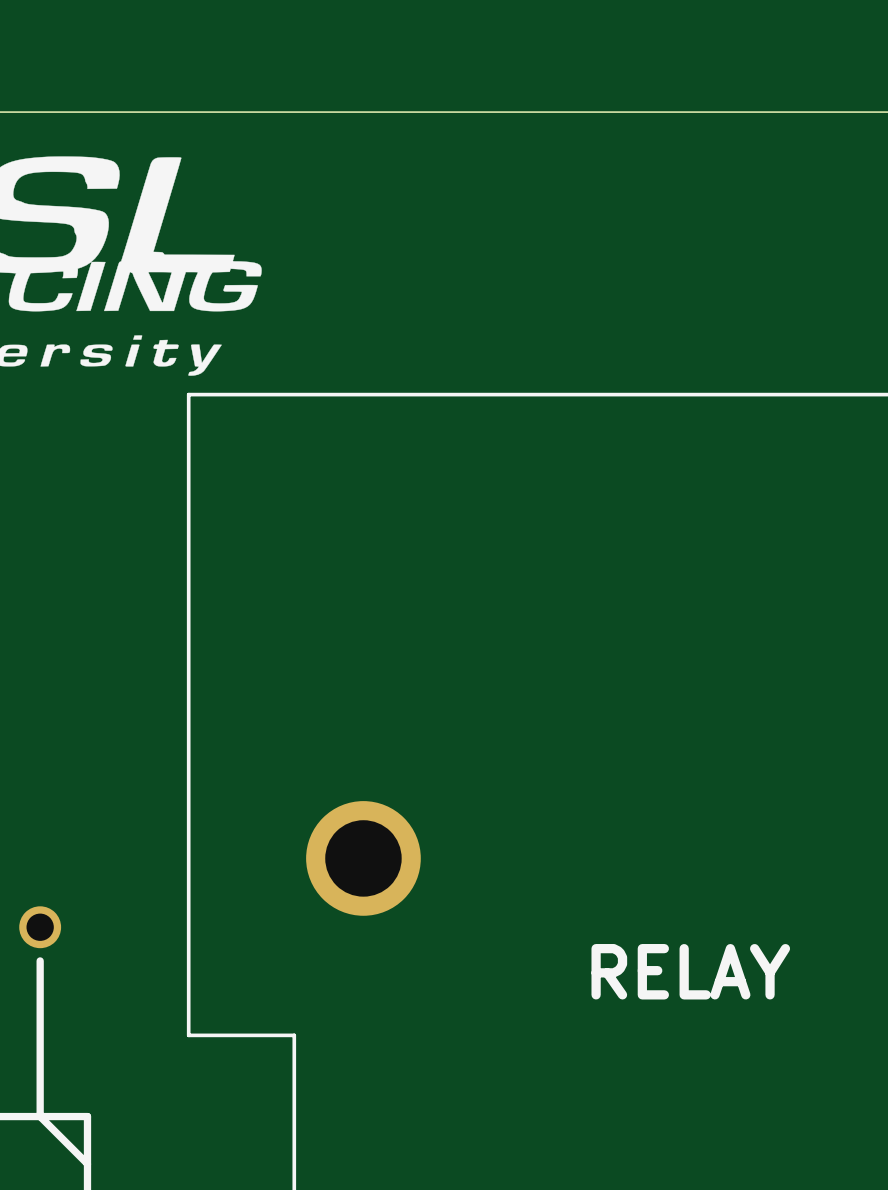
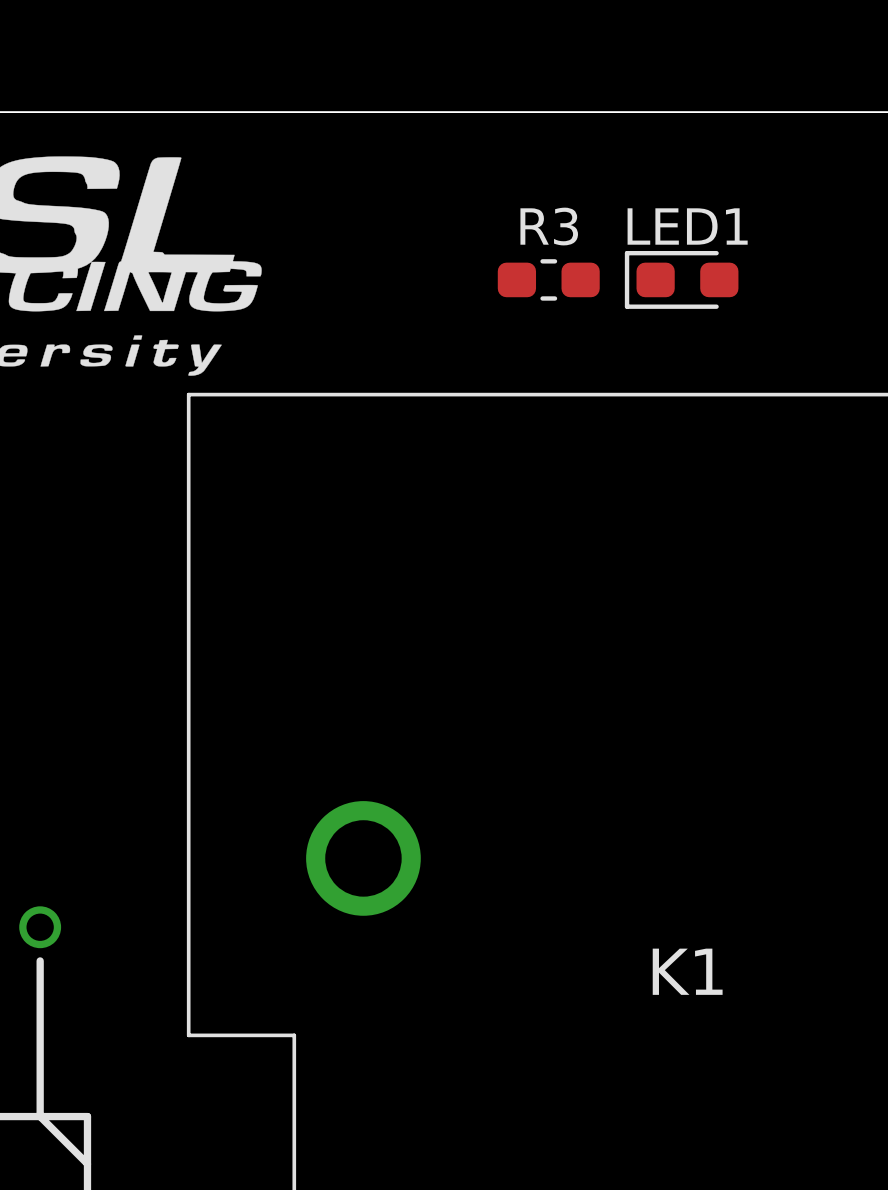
R3: none -> (548, 279)
LED1: none -> (681, 279)
RELAY name: RELAY (690, 971) -> K1 (687, 971)

